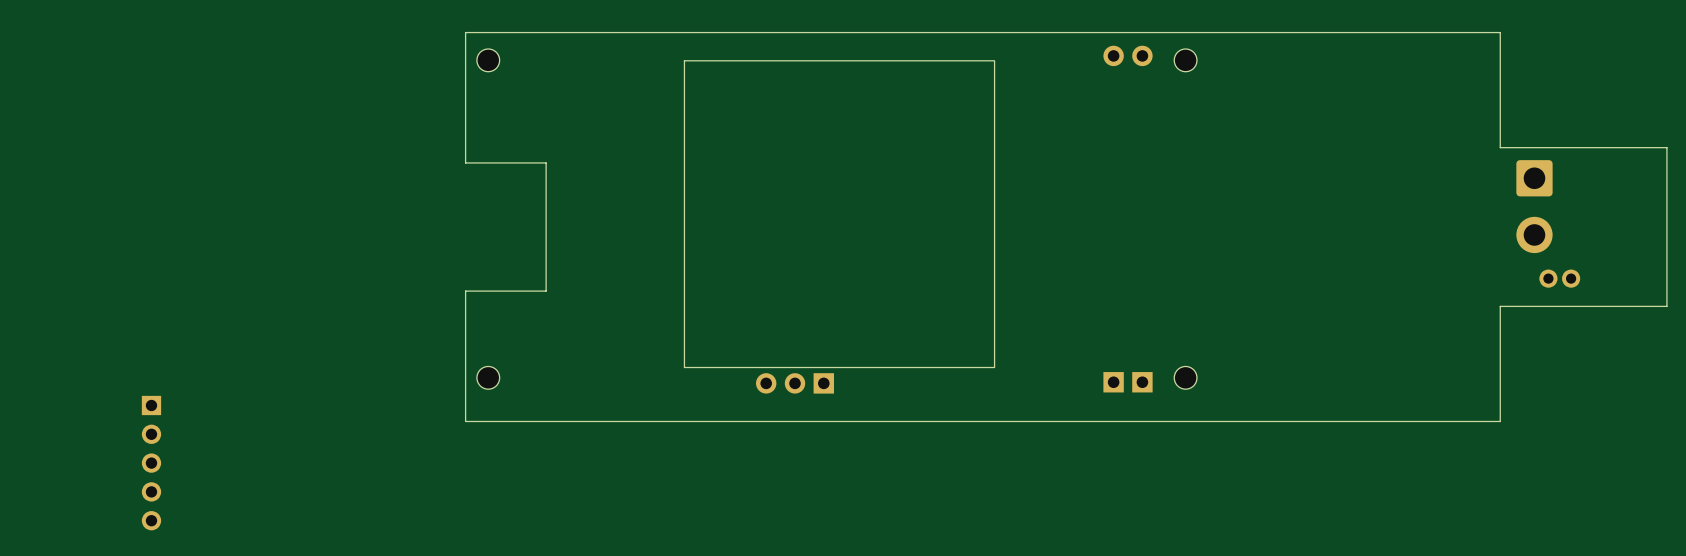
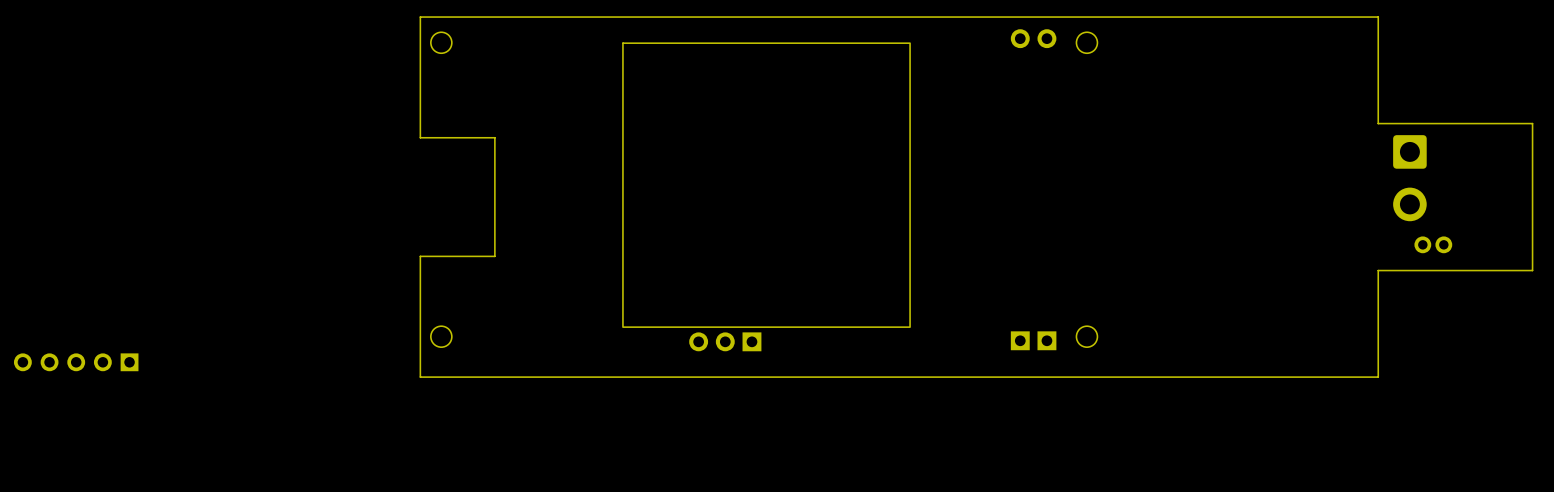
part rotation: 0° (151, 463) -> 90° clockwise (76, 362)
part position: (151, 463) -> (76, 362)

